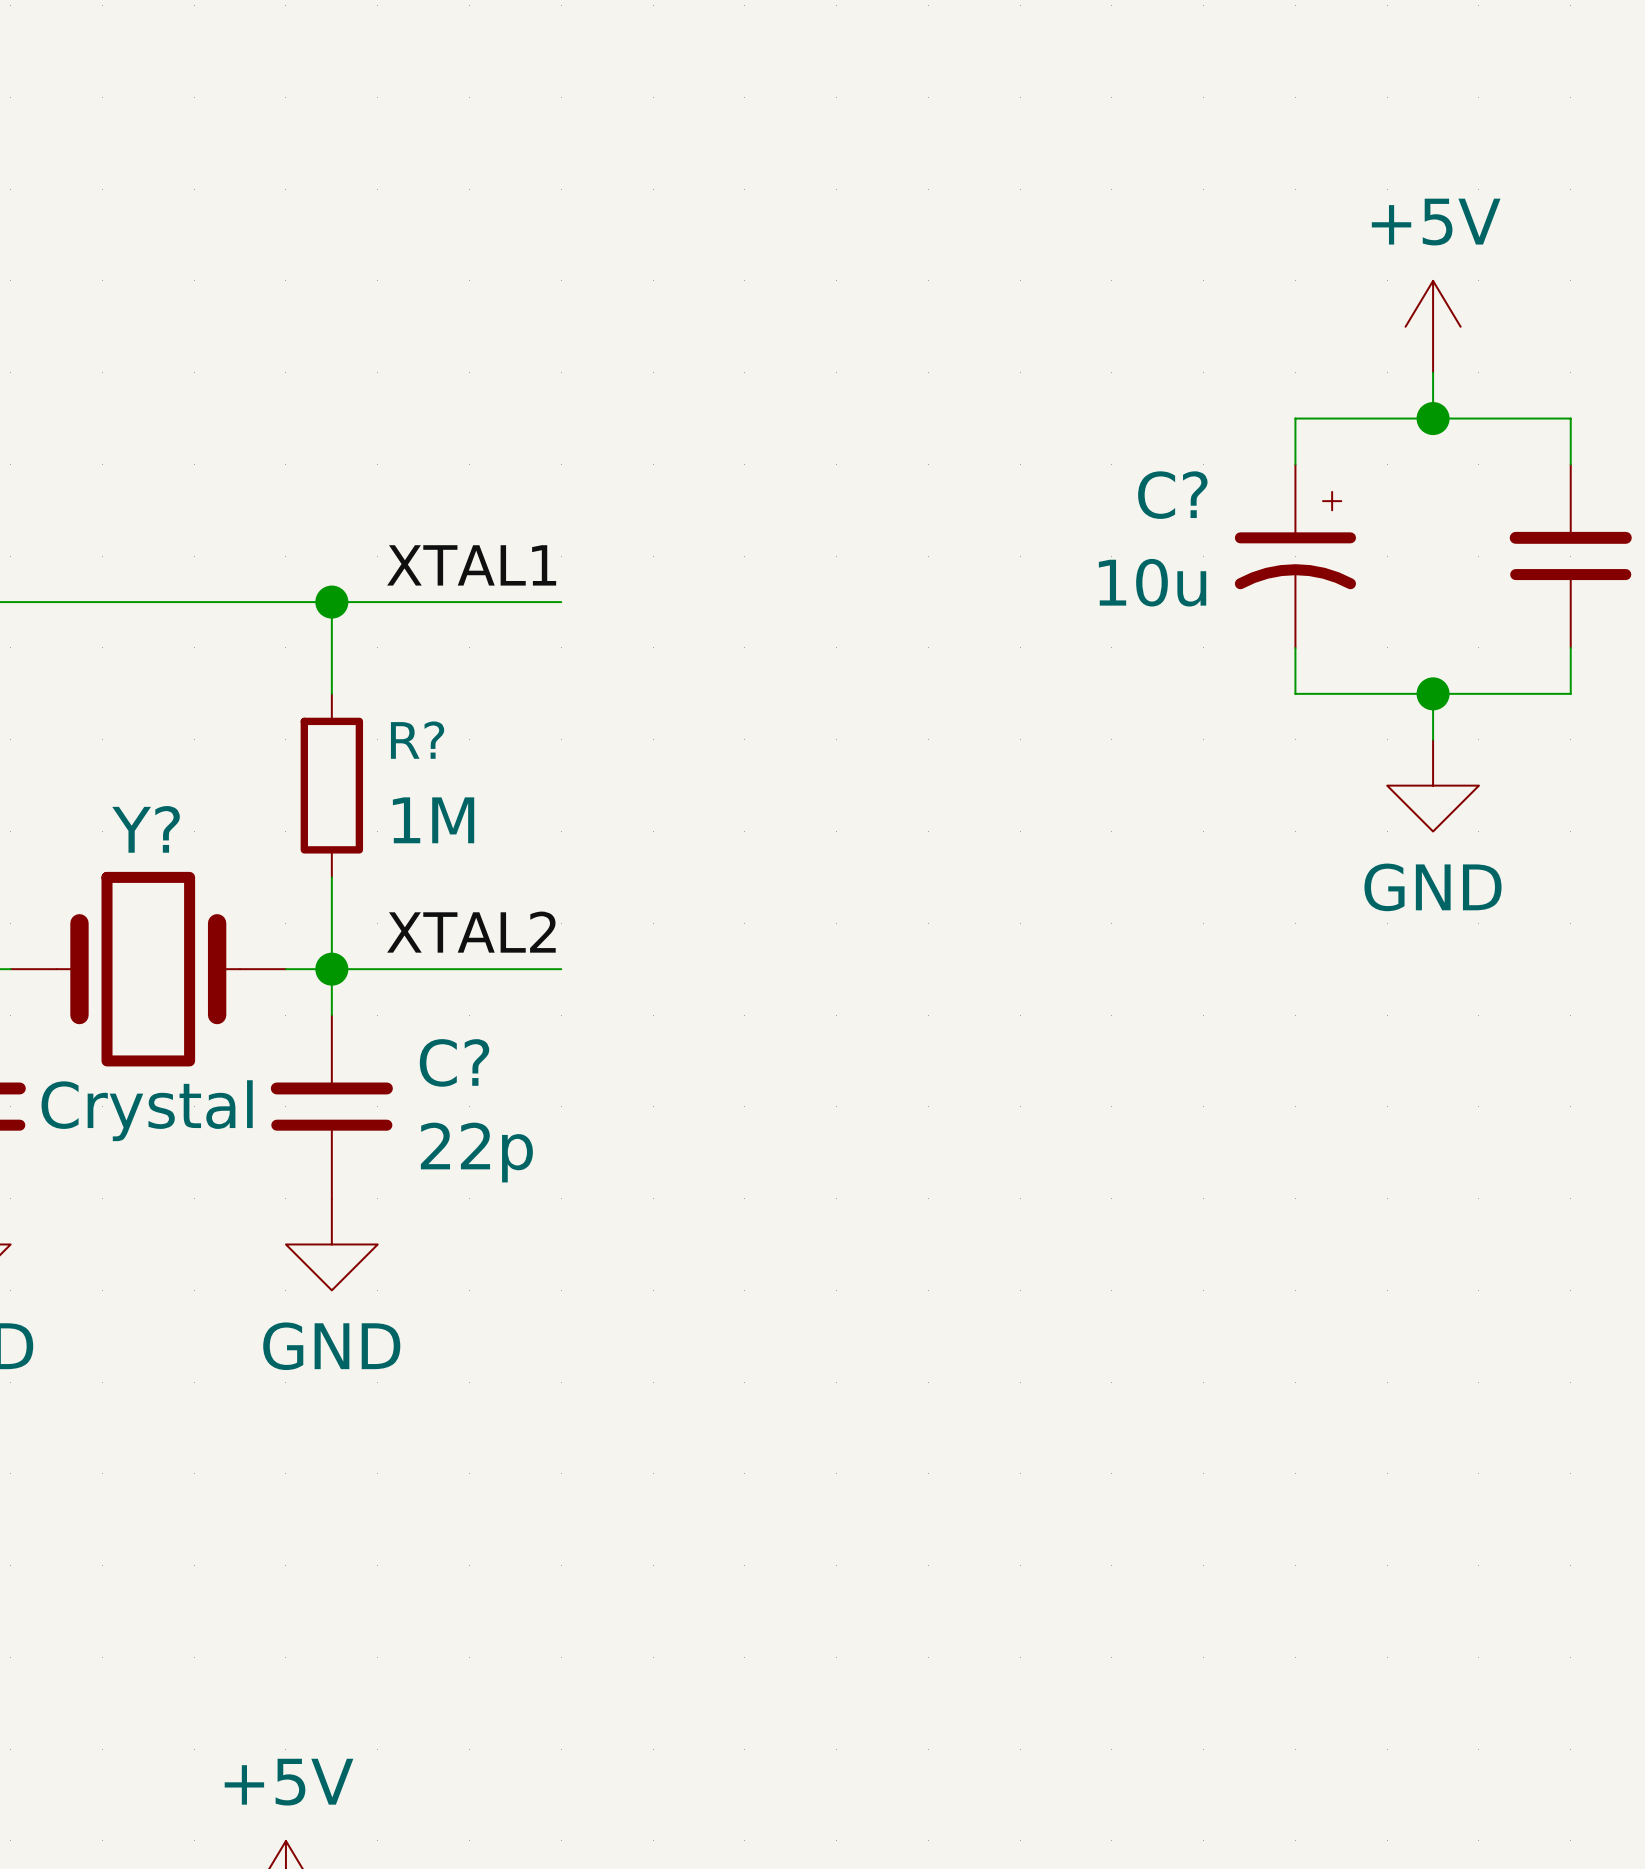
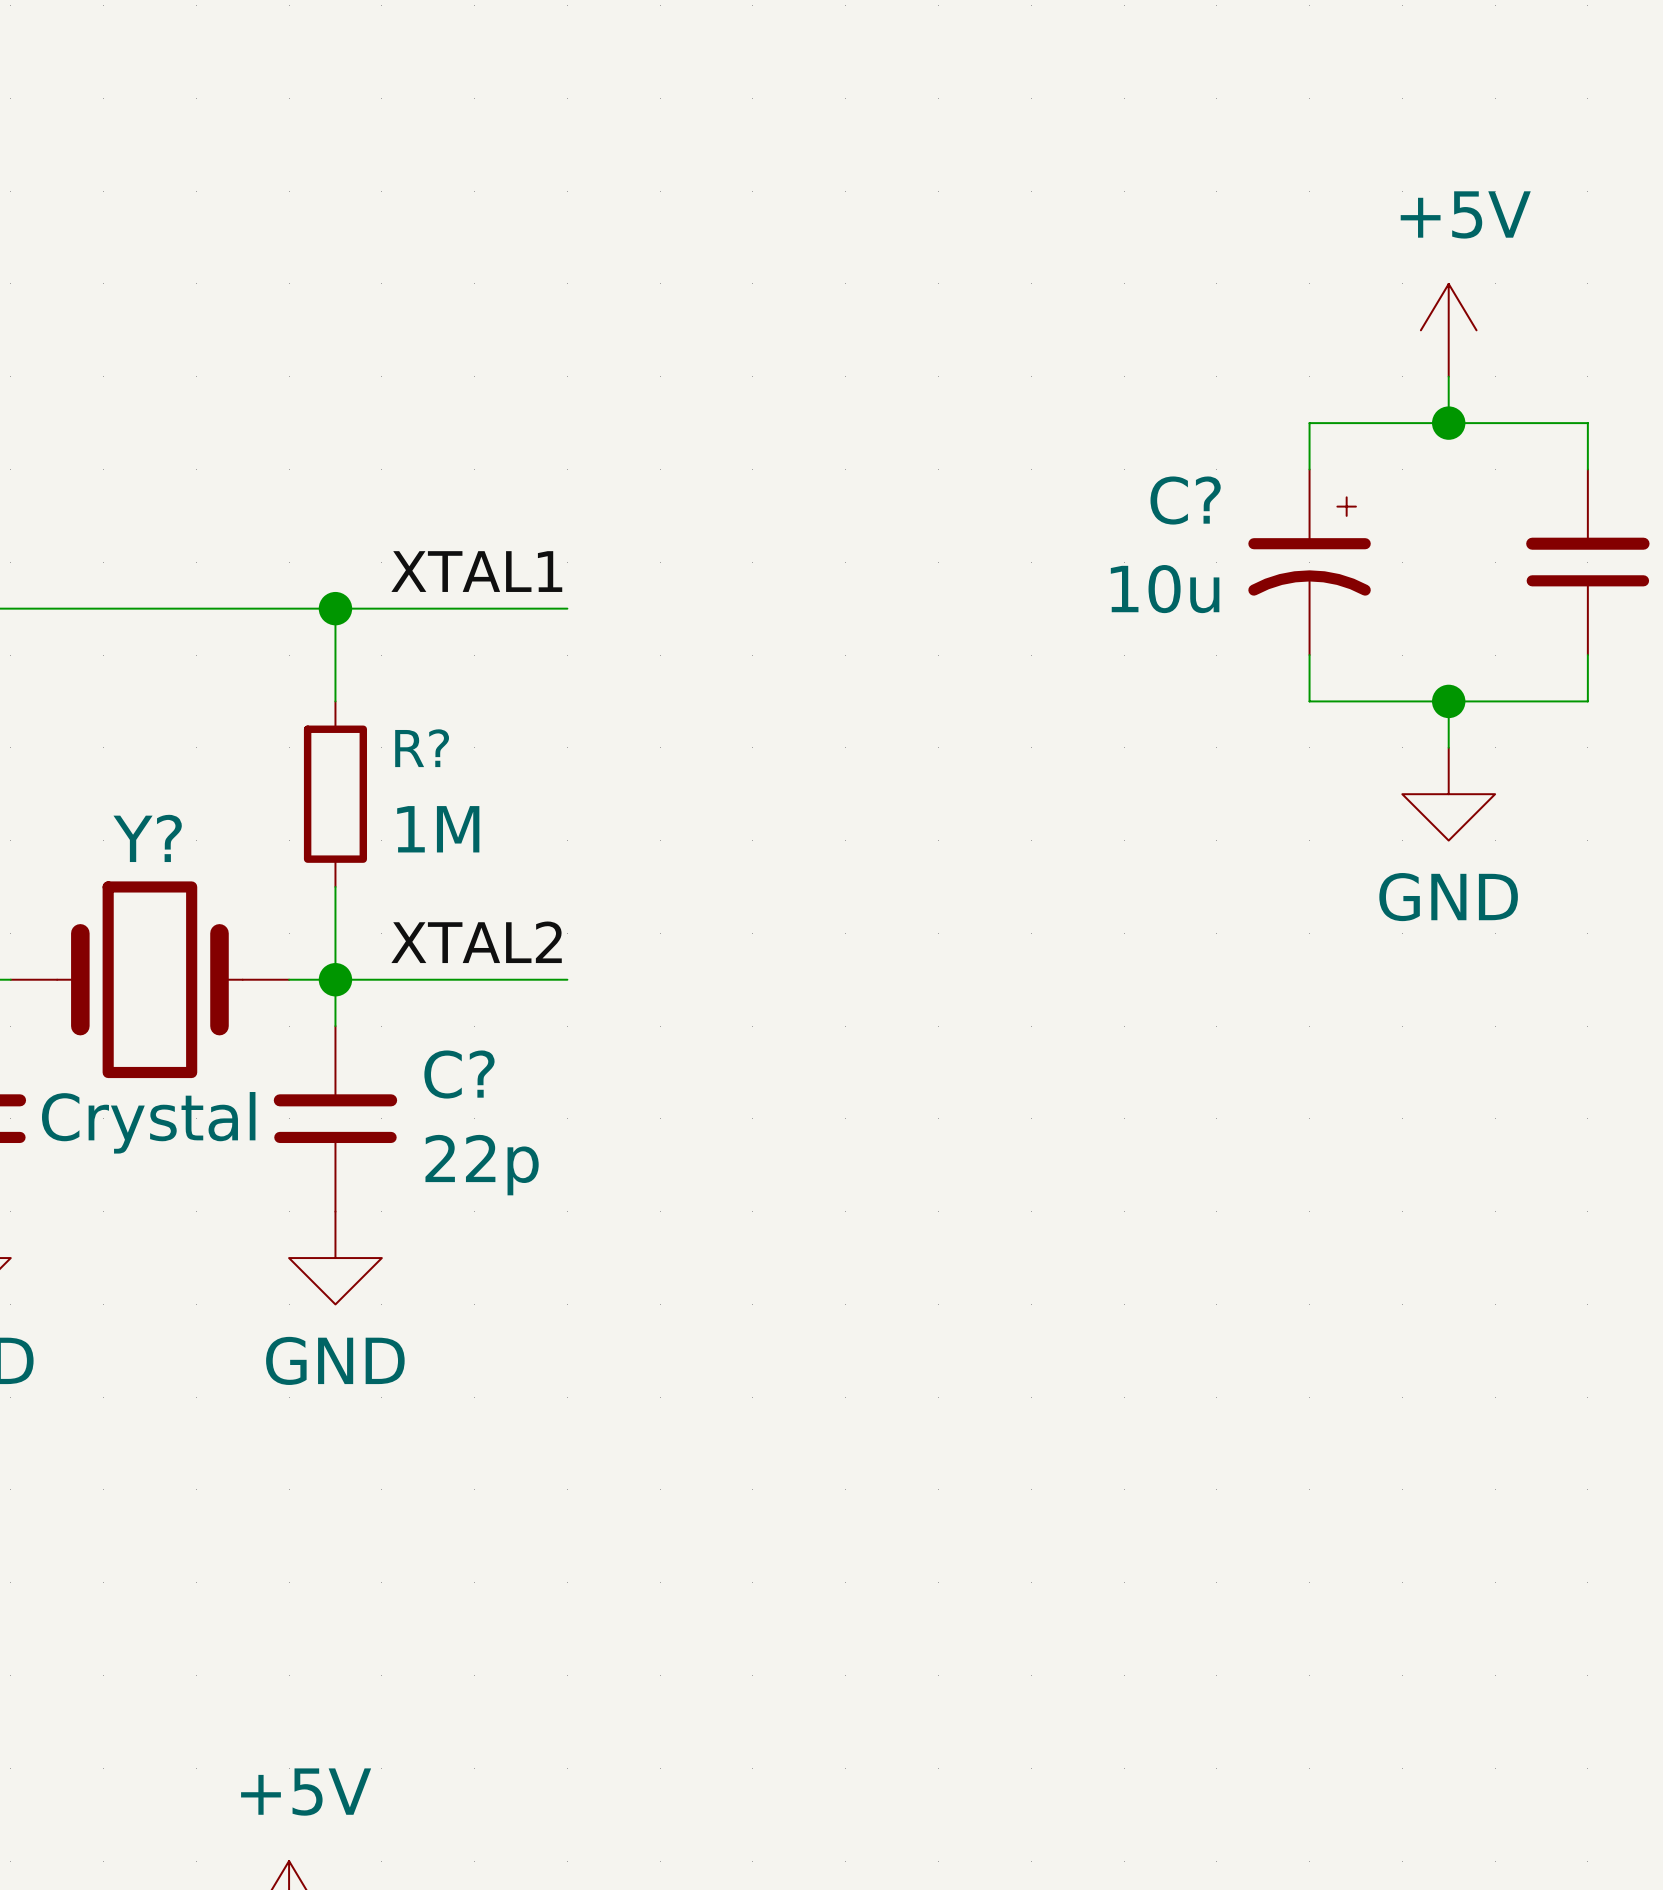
power symbol text position: +5V (1436, 222) -> +5V (1465, 214)
power symbol text position: +5V (289, 1782) -> +5V (306, 1792)

